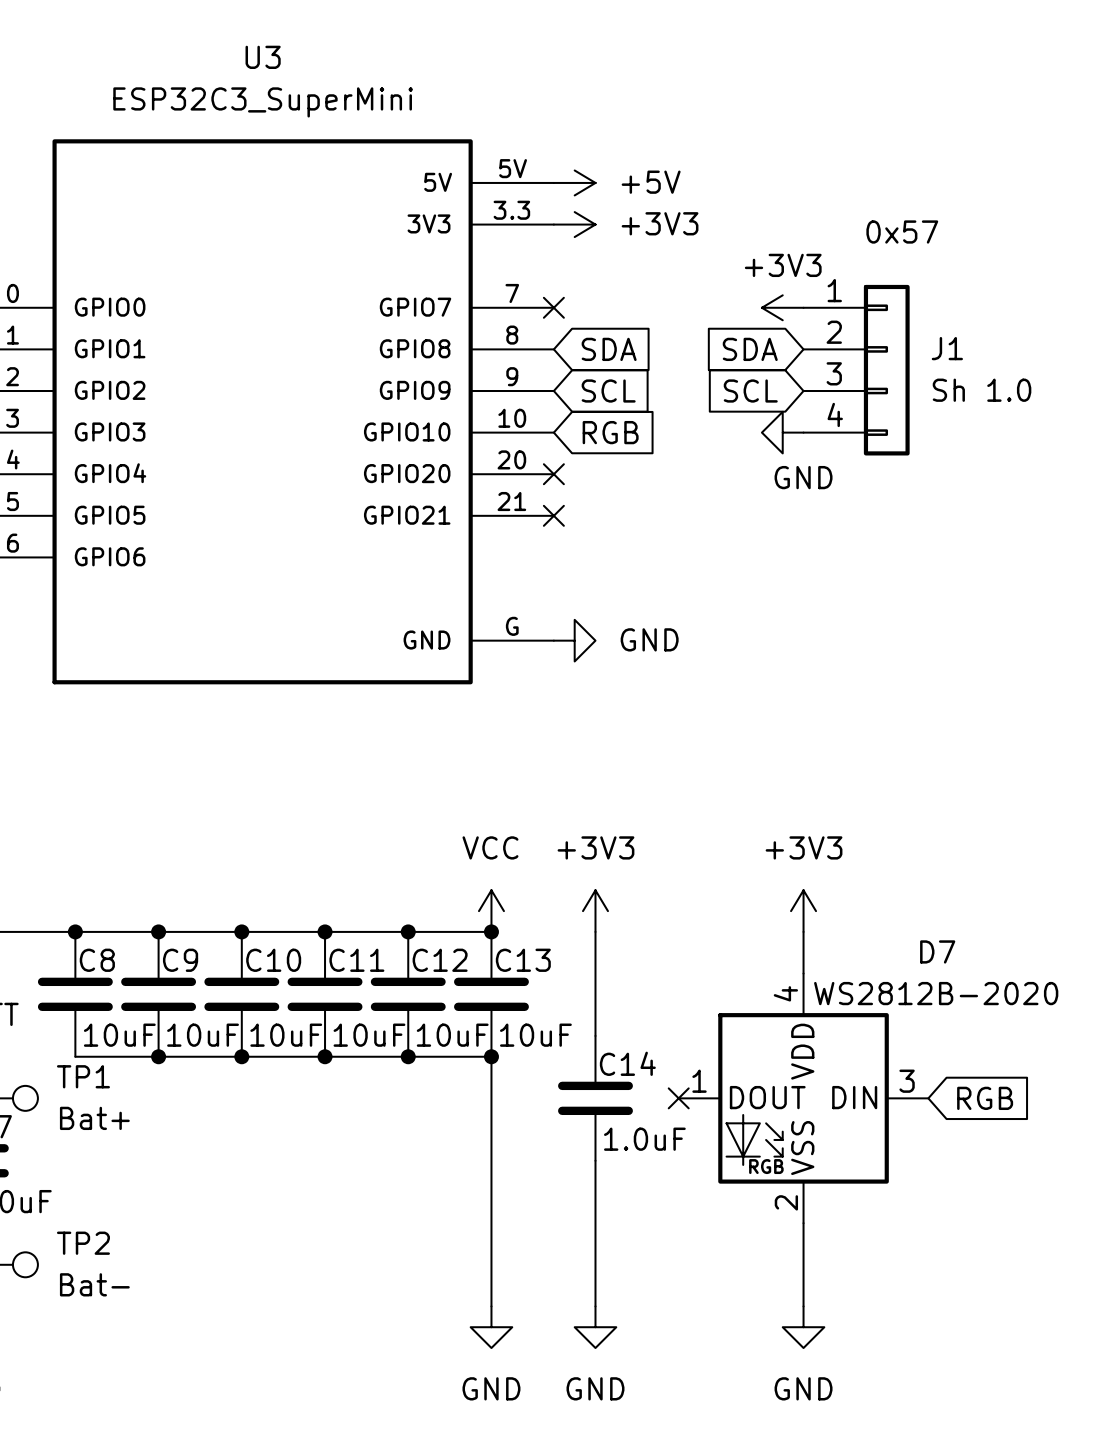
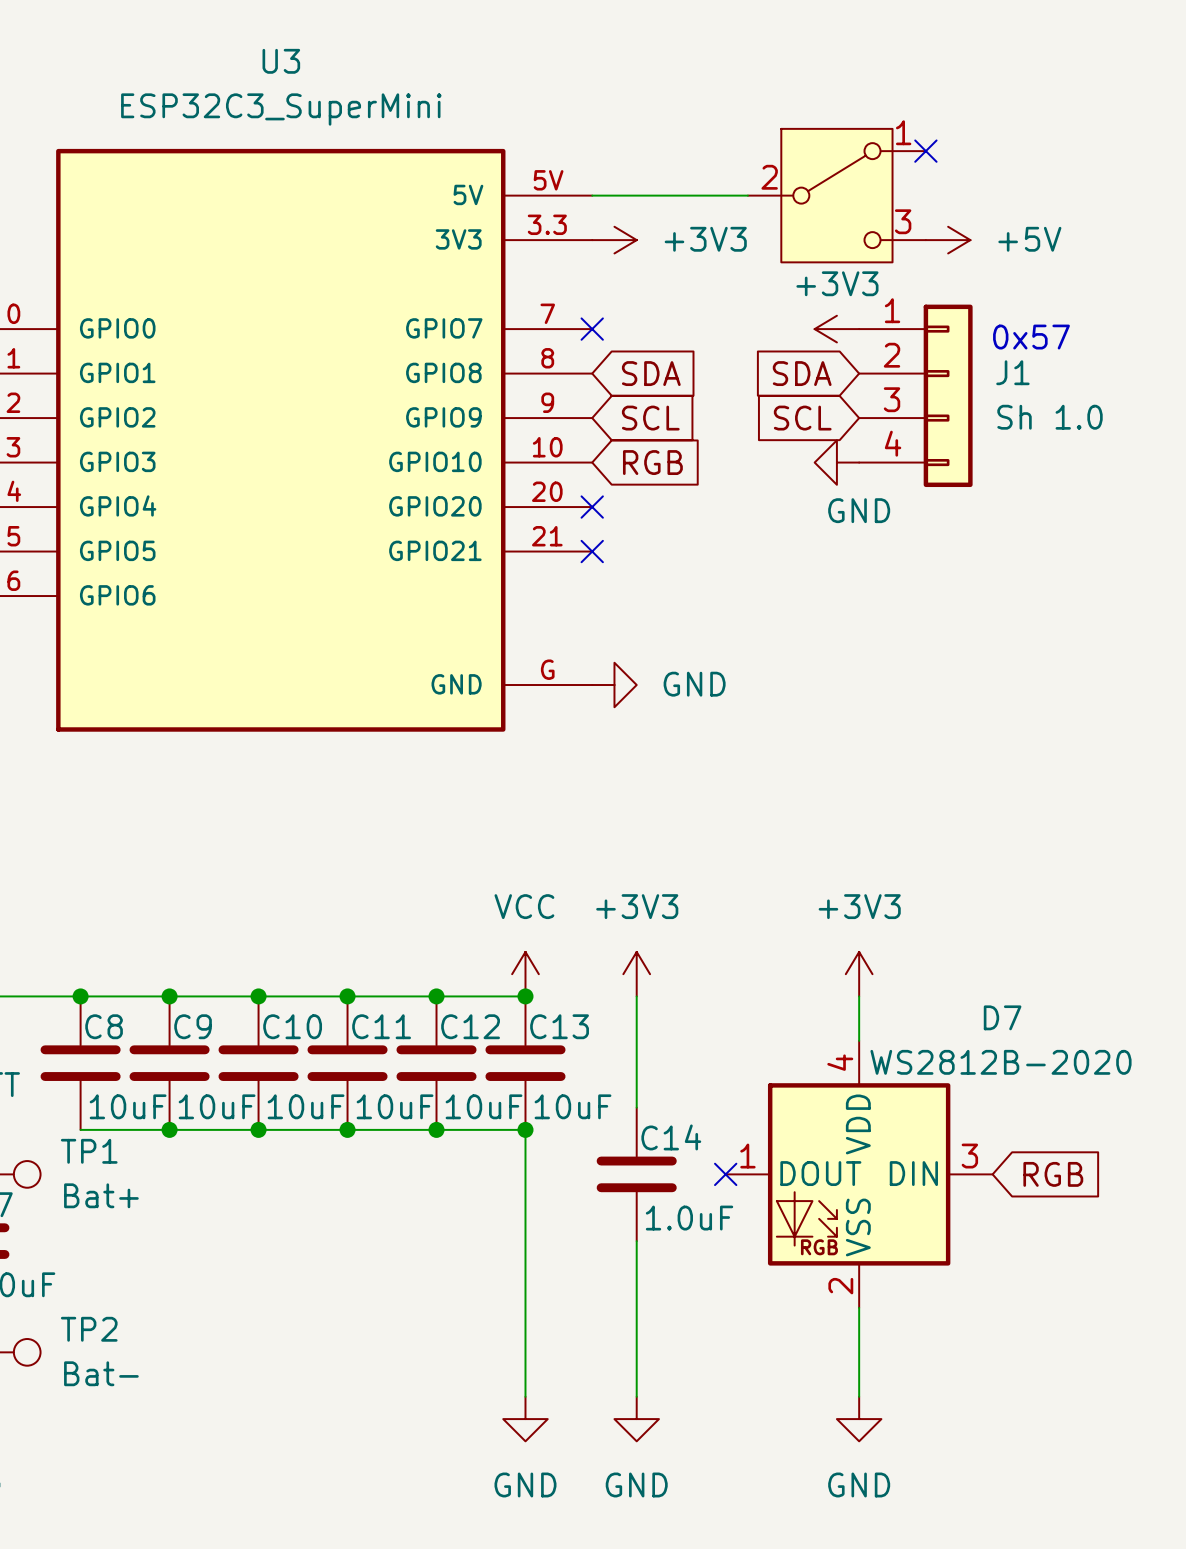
no-connect mark: none -> (925, 151)
wire: none -> (592, 195) (747, 195)
power symbol position: +5V (574, 182) -> +5V (948, 240)
part: none -> (836, 195)
text position: 0x57 (902, 232) -> 0x57 (1031, 337)

